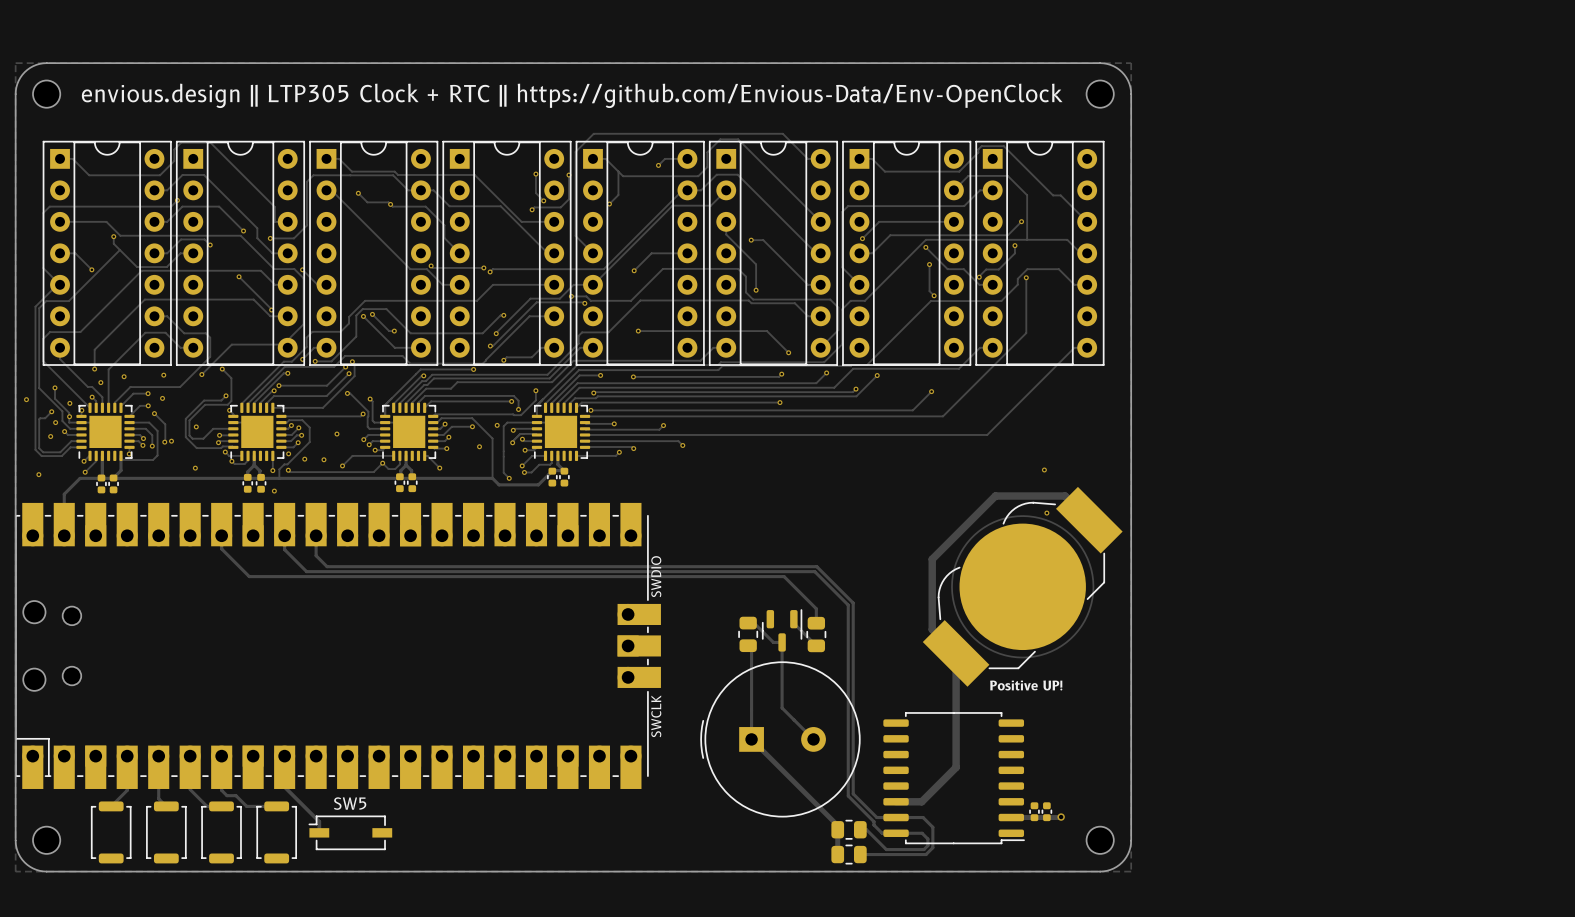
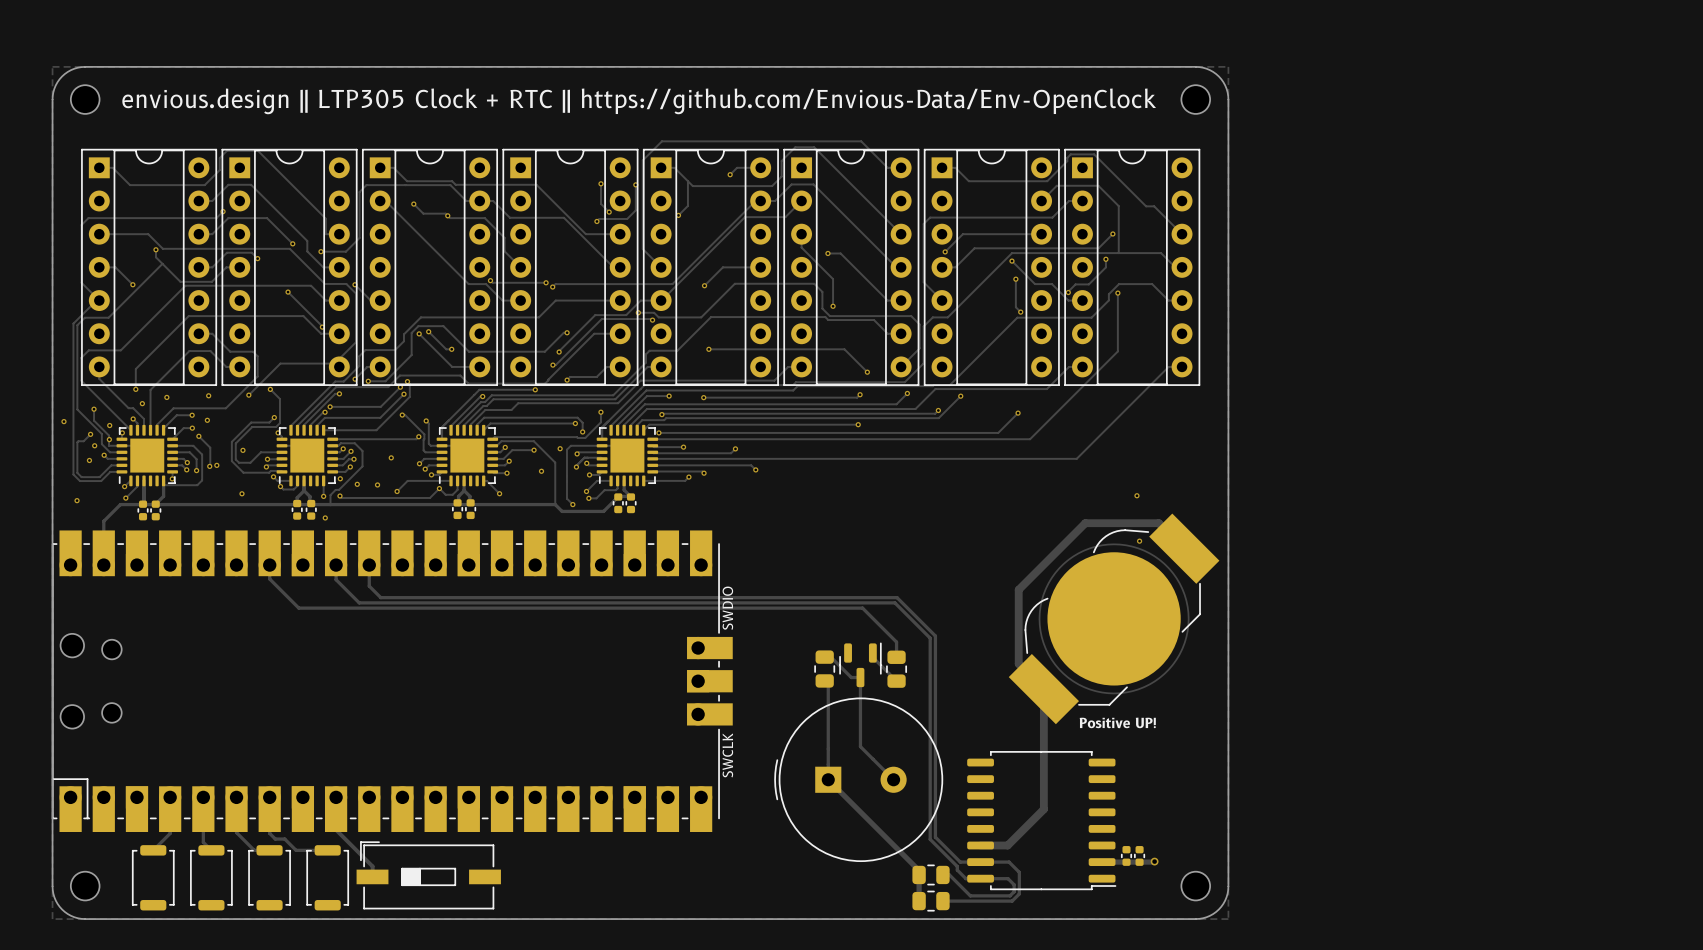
part: none -> (428, 875)
SW5: (350, 832) -> none

